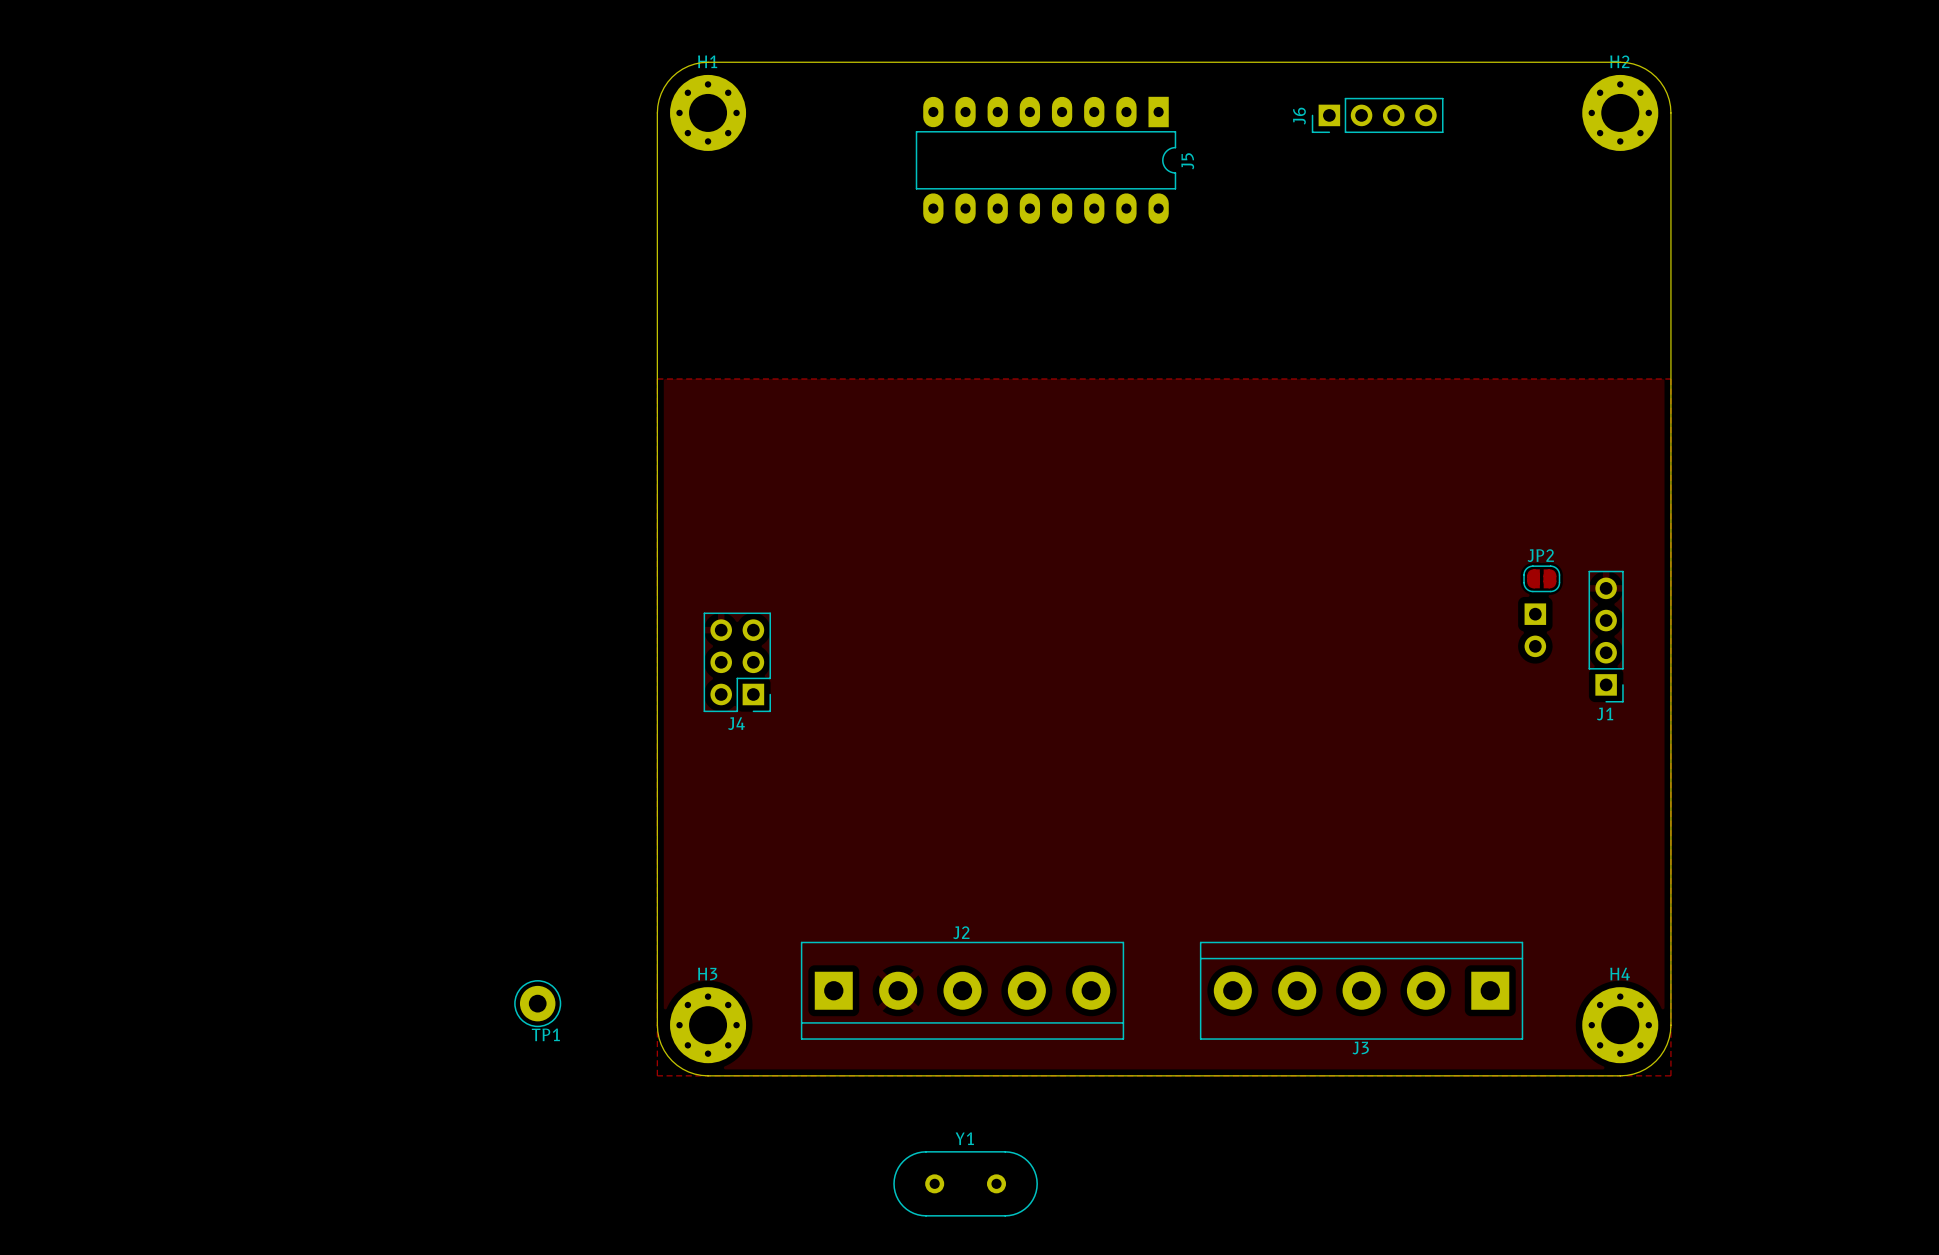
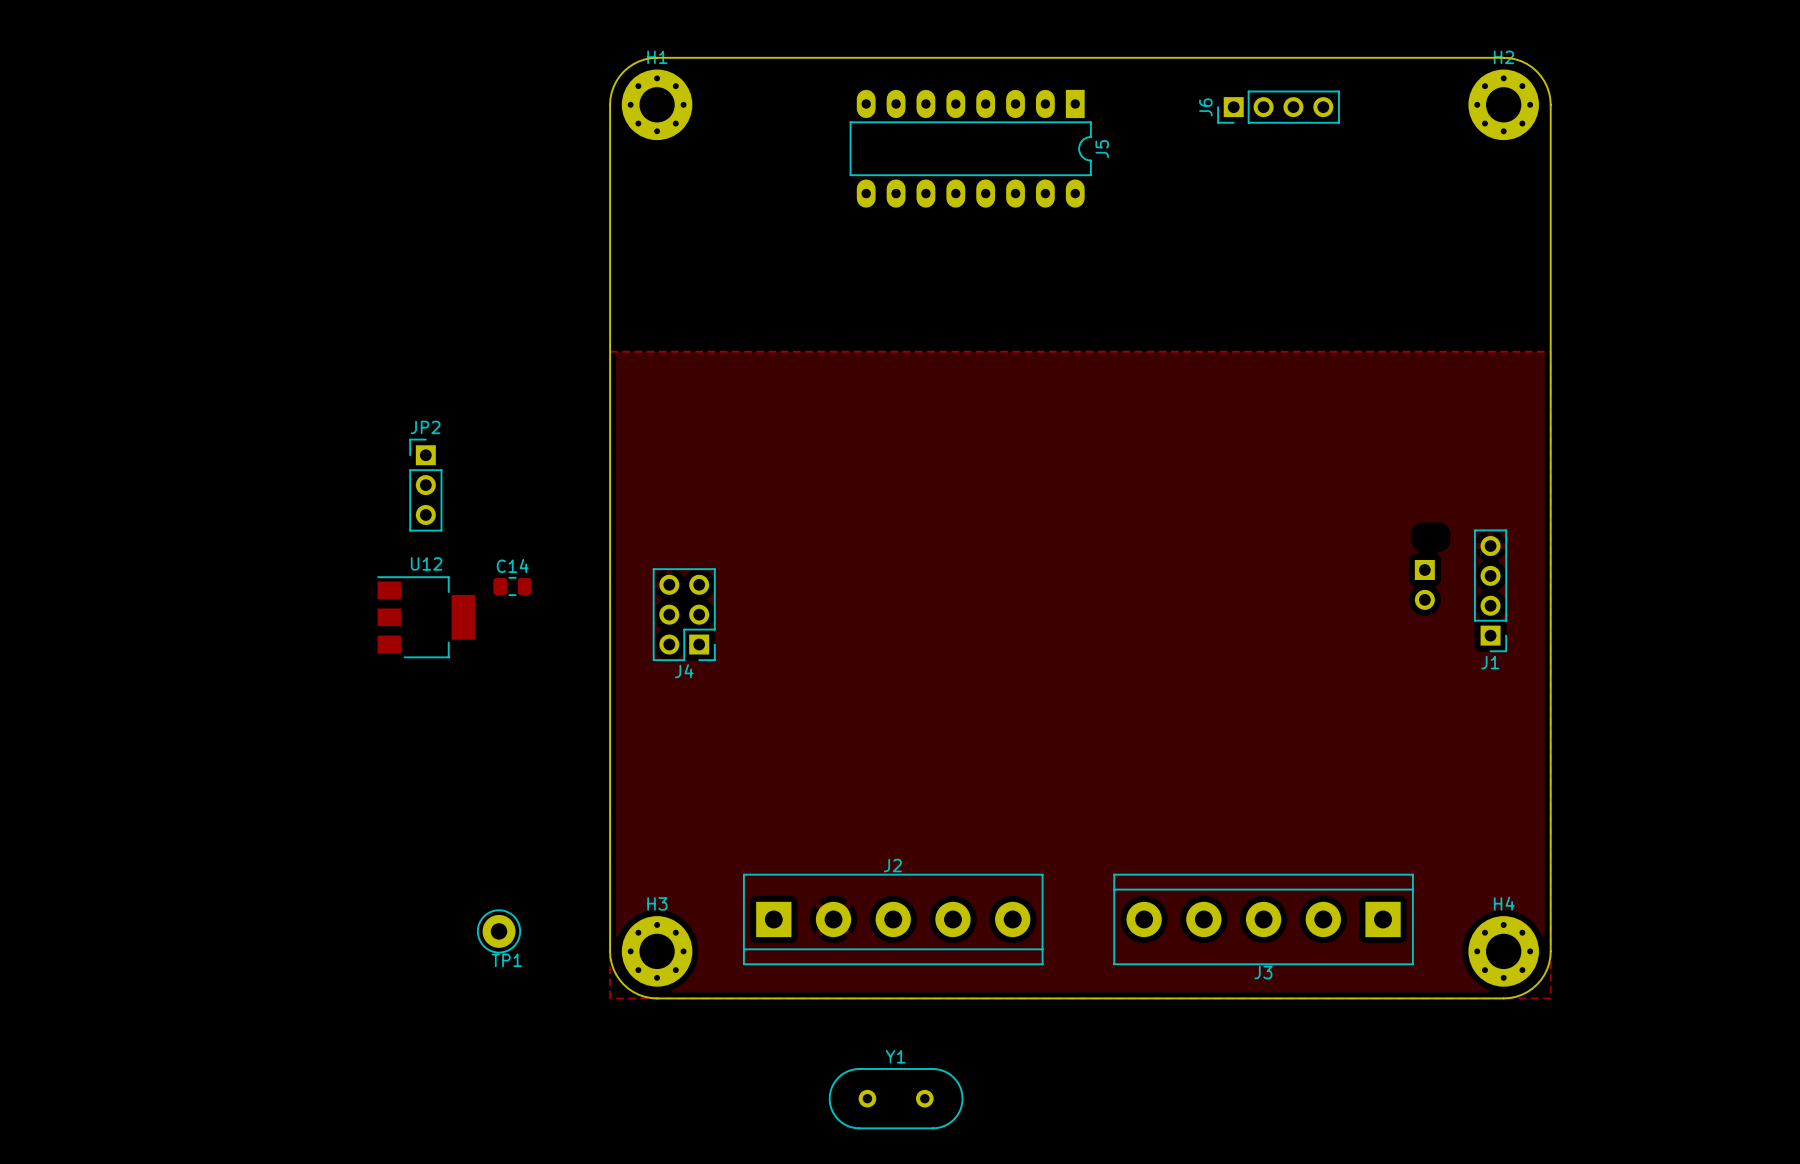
JP2 name position: JP2 (1540, 555) -> JP2 (425, 427)
JP2 footprint: [1523, 565, 1561, 593] -> [409, 438, 443, 532]
C14: none -> (512, 586)
U12: none -> (426, 617)

